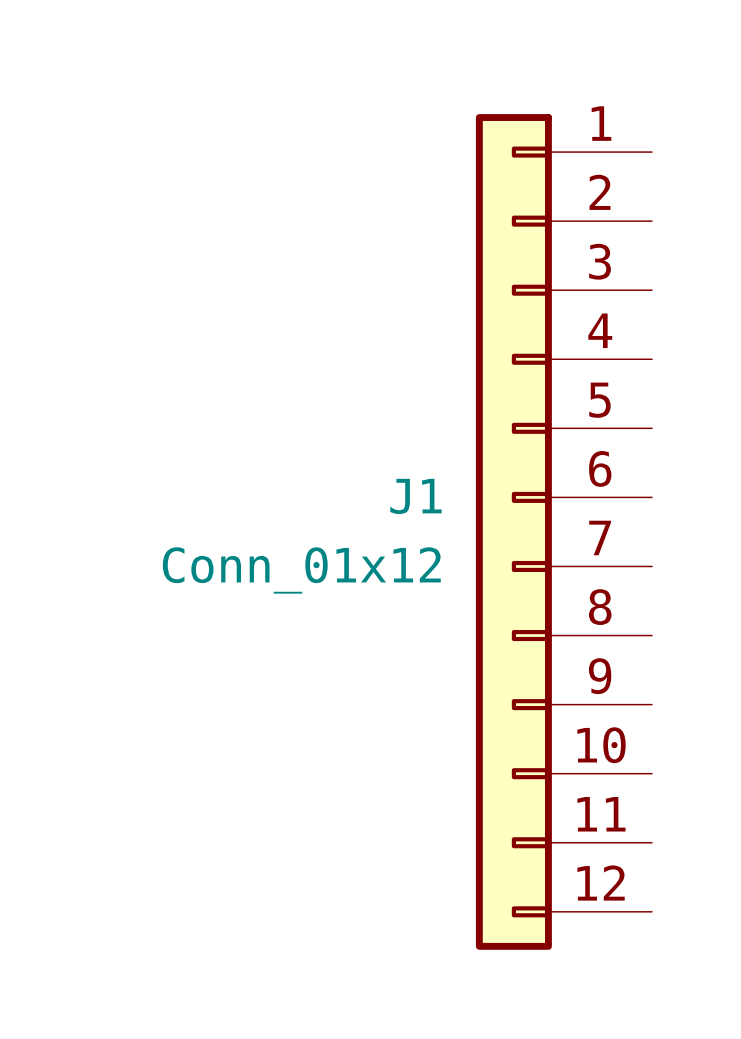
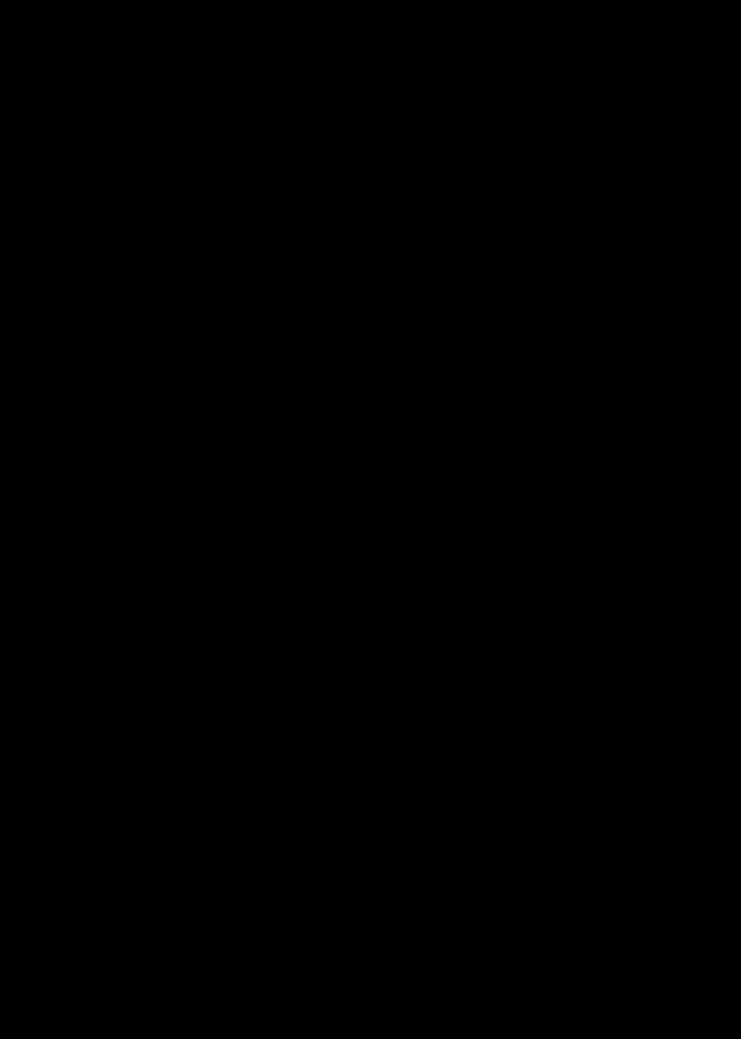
J1: Conn_01x12 (563, 531) -> none

